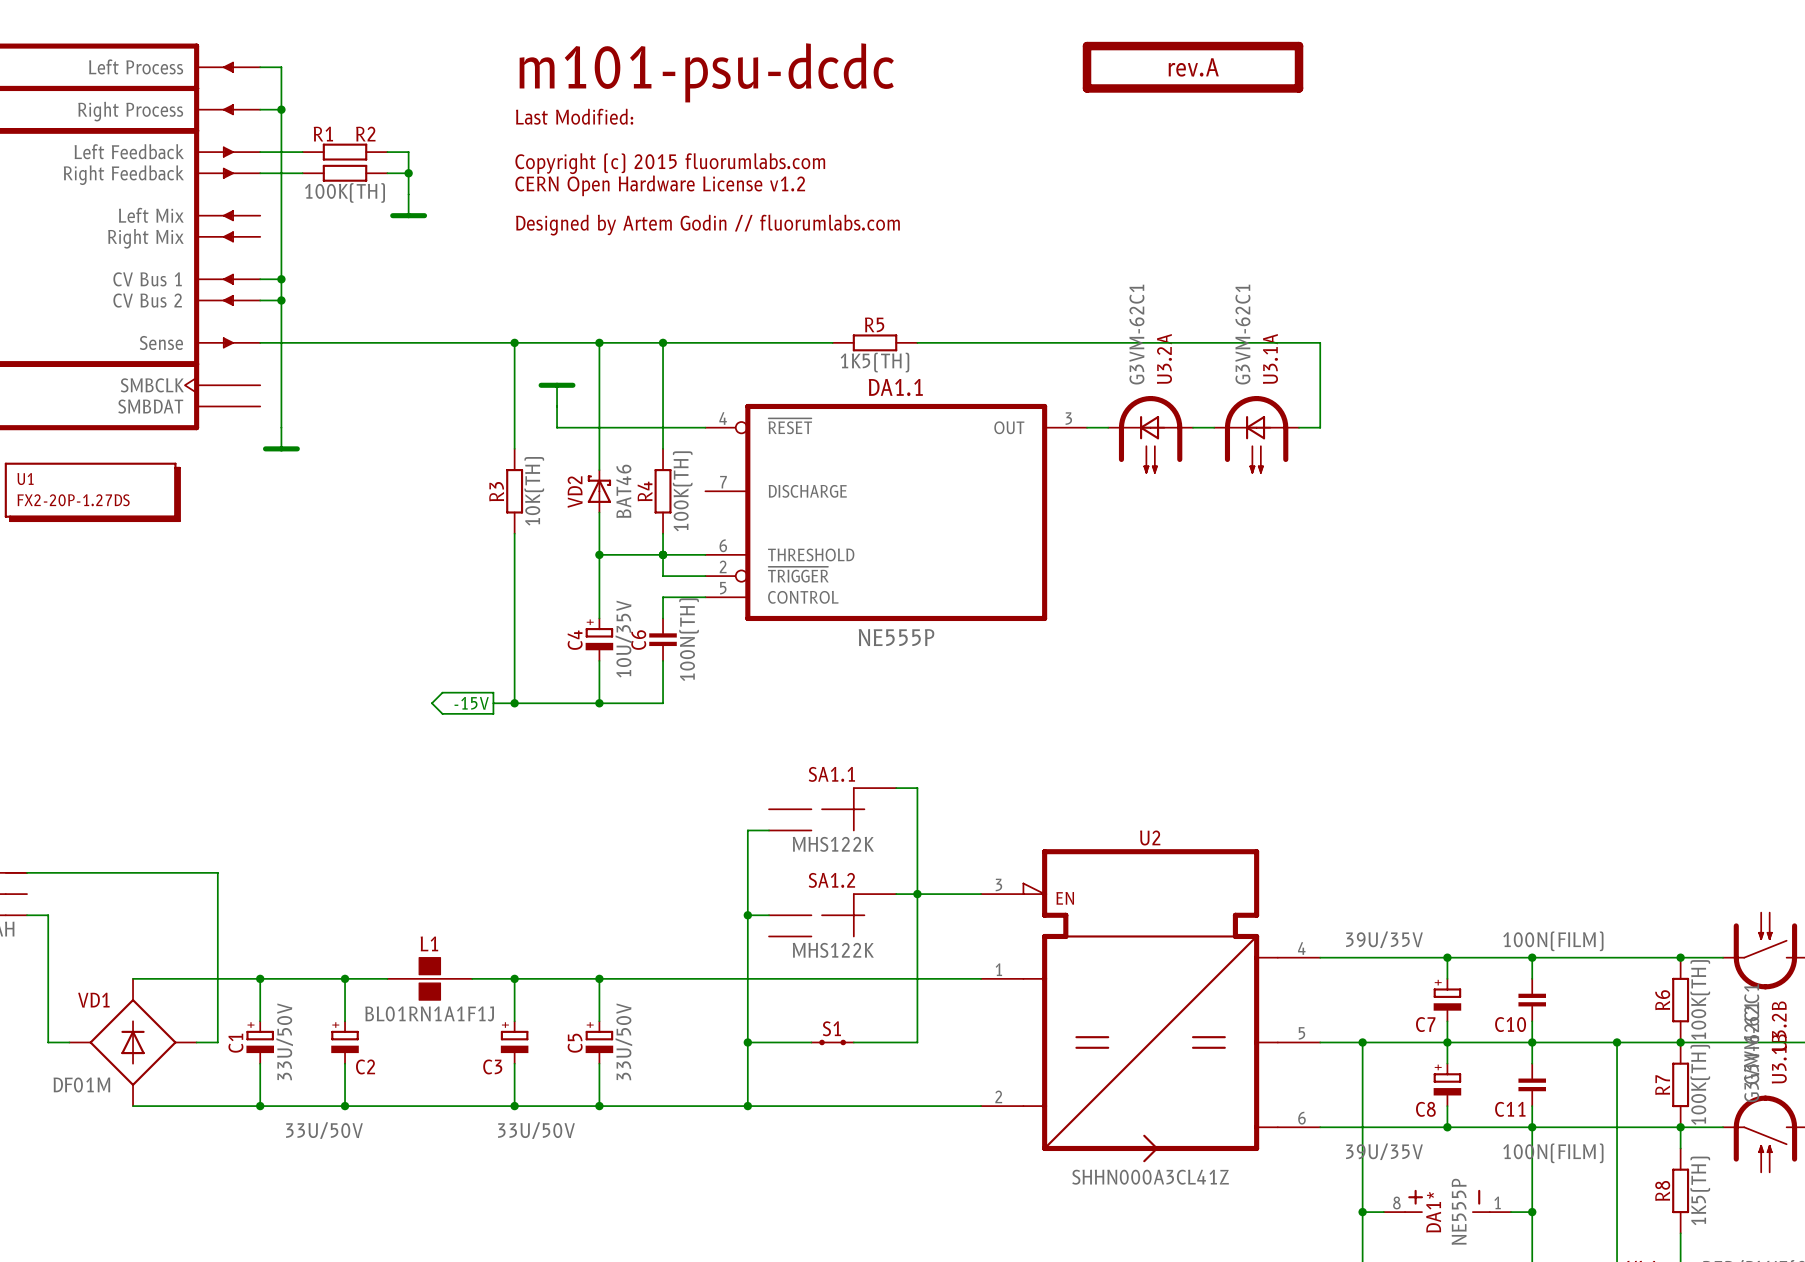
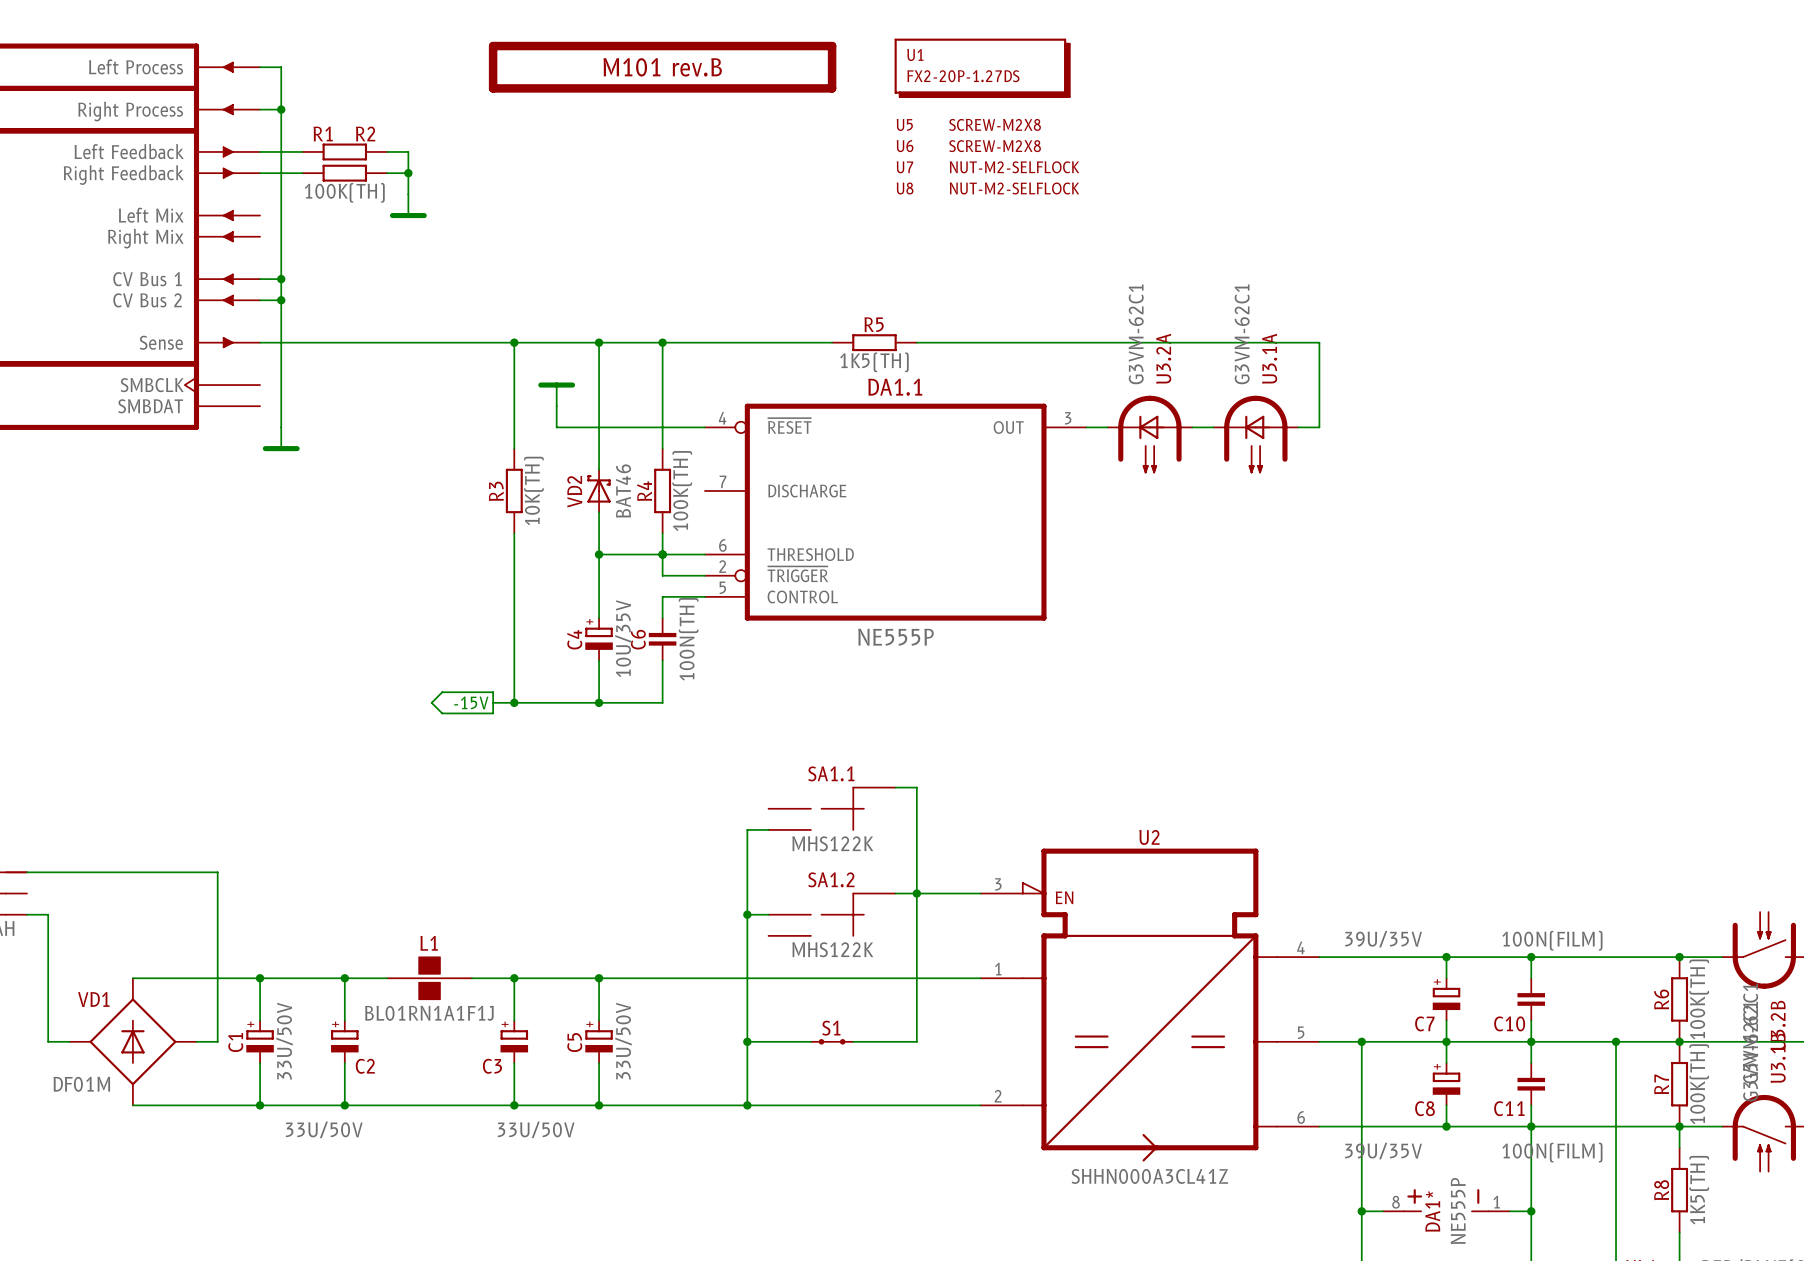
part: none -> M101 rev.B (662, 67)
part: rev.A (1193, 67) -> none
U5: none -> SCREW-M2X8 (968, 124)
part: Designed by Artem Godin // fluorumlabs.com (707, 139) -> none
U6: none -> SCREW-M2X8 (968, 146)
U7: none -> NUT-M2-SELFLOCK (987, 167)
U8: none -> NUT-M2-SELFLOCK (987, 188)
U1 position: (92, 492) -> (982, 68)

